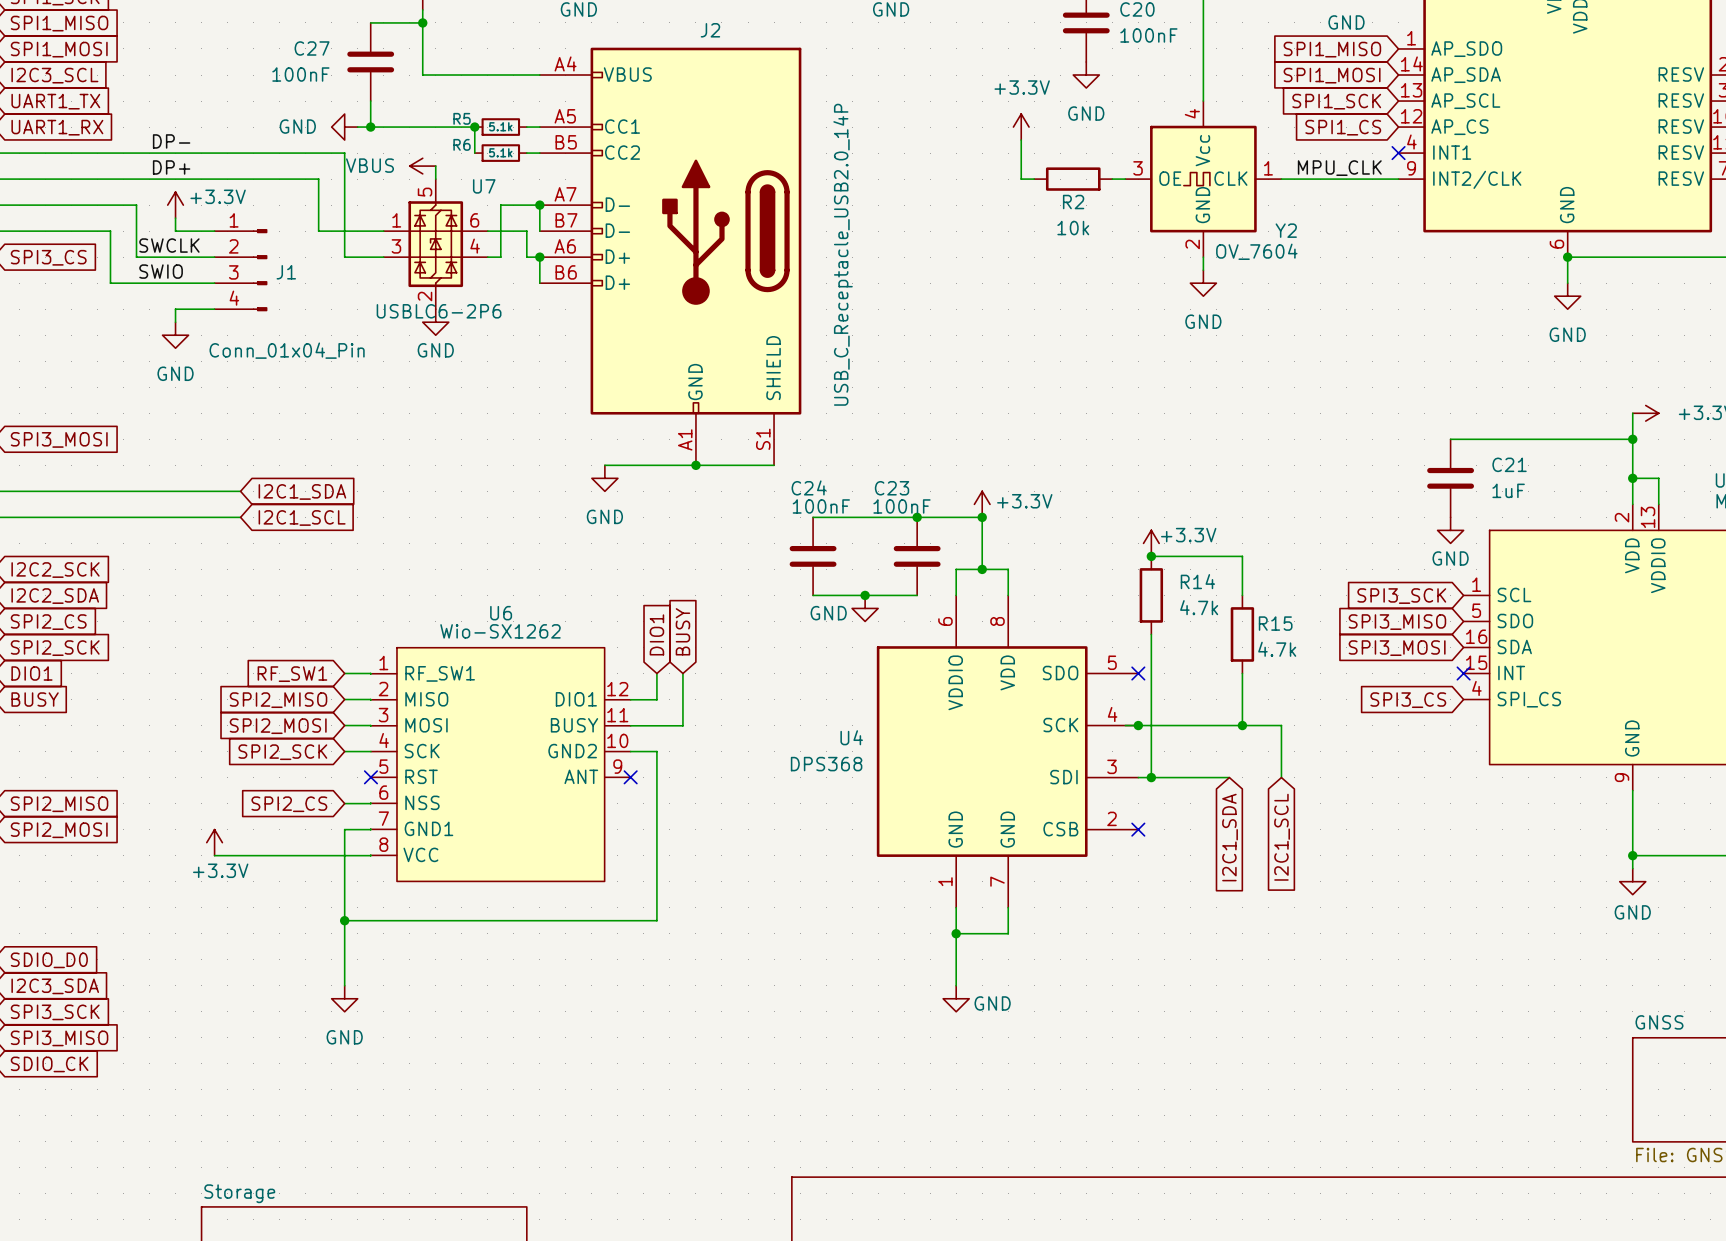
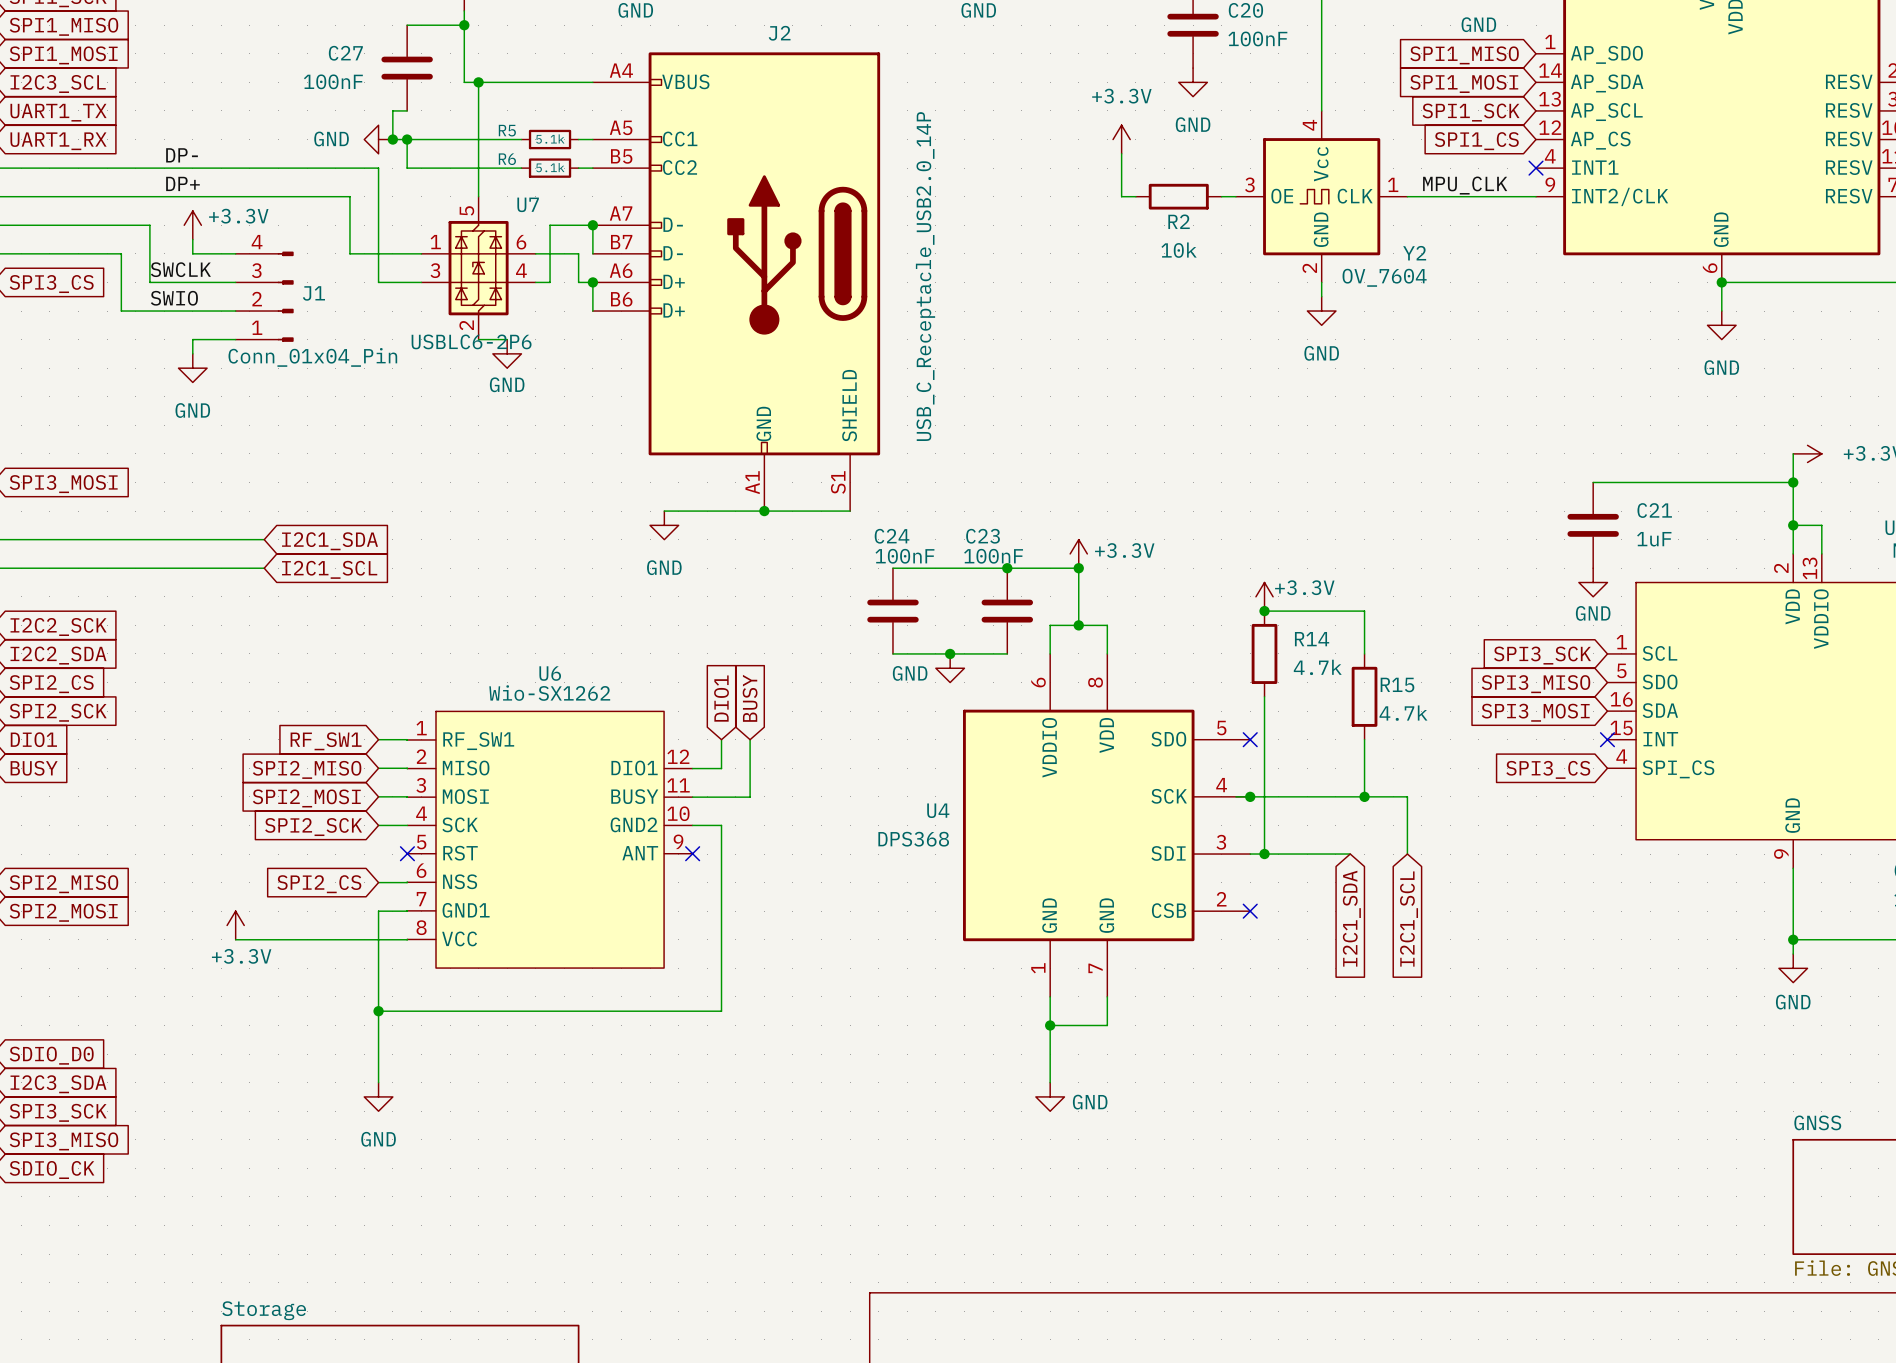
wire: none -> (478, 82) (478, 182)
junction: none -> (478, 82)
wire: (370, 101) (370, 127) -> (407, 110) (392, 110) (392, 139)
junction: none -> (392, 139)
wire: (474, 127) (474, 153) -> (407, 139) (407, 168) (521, 168)
junction: (474, 127) -> none
power symbol: VBUS (422, 166) -> none
J1 flip: as is (260, 270) -> up-down (285, 296)
wire: none -> (478, 339) (507, 339)
power symbol position: GND (435, 322) -> GND (507, 353)
J1 value position: Conn_01x04_Pin (287, 350) -> Conn_01x04_Pin (312, 357)

